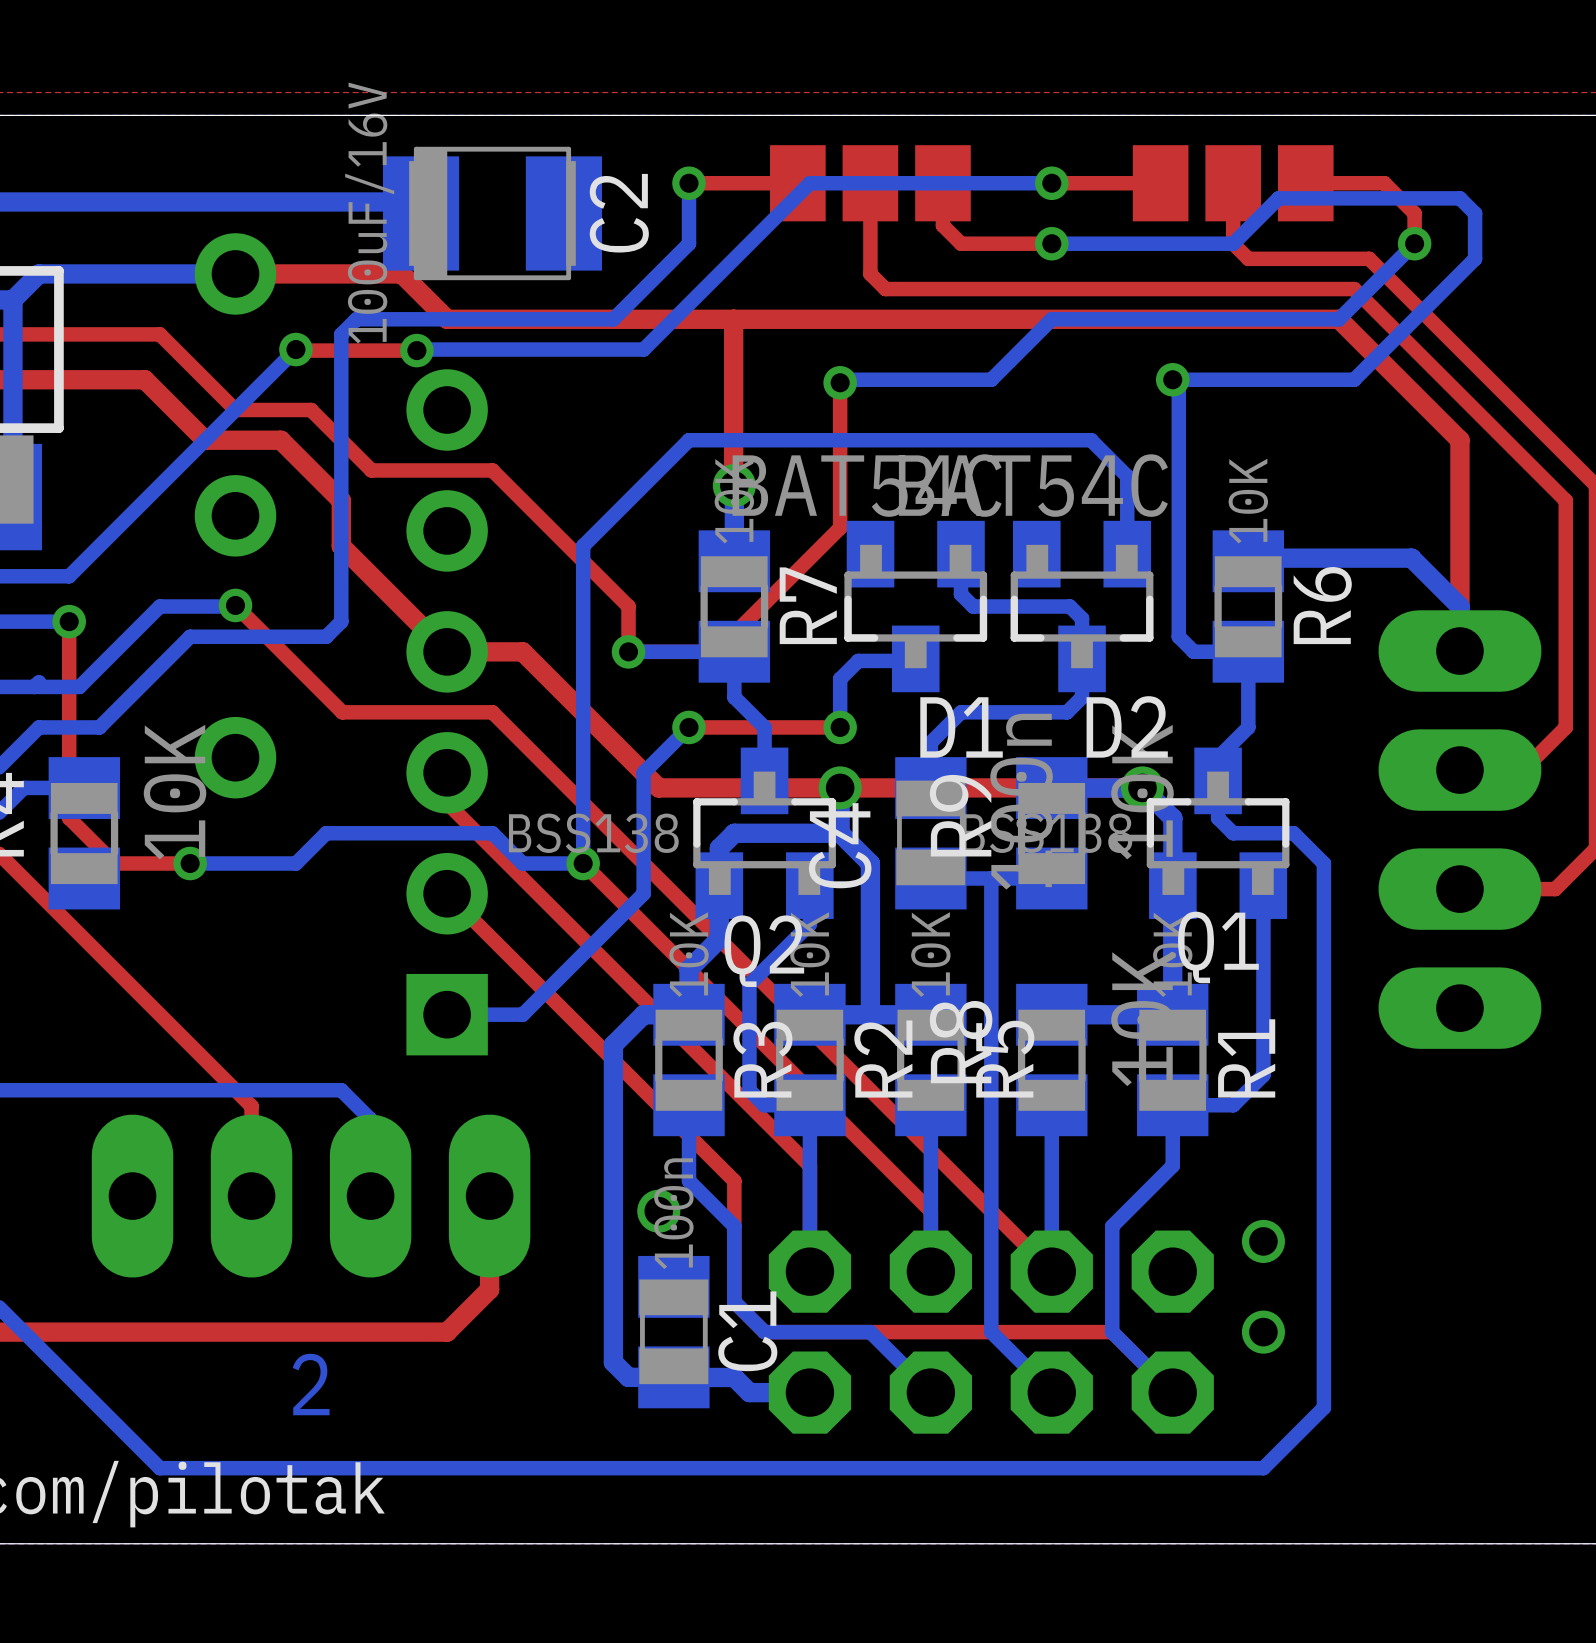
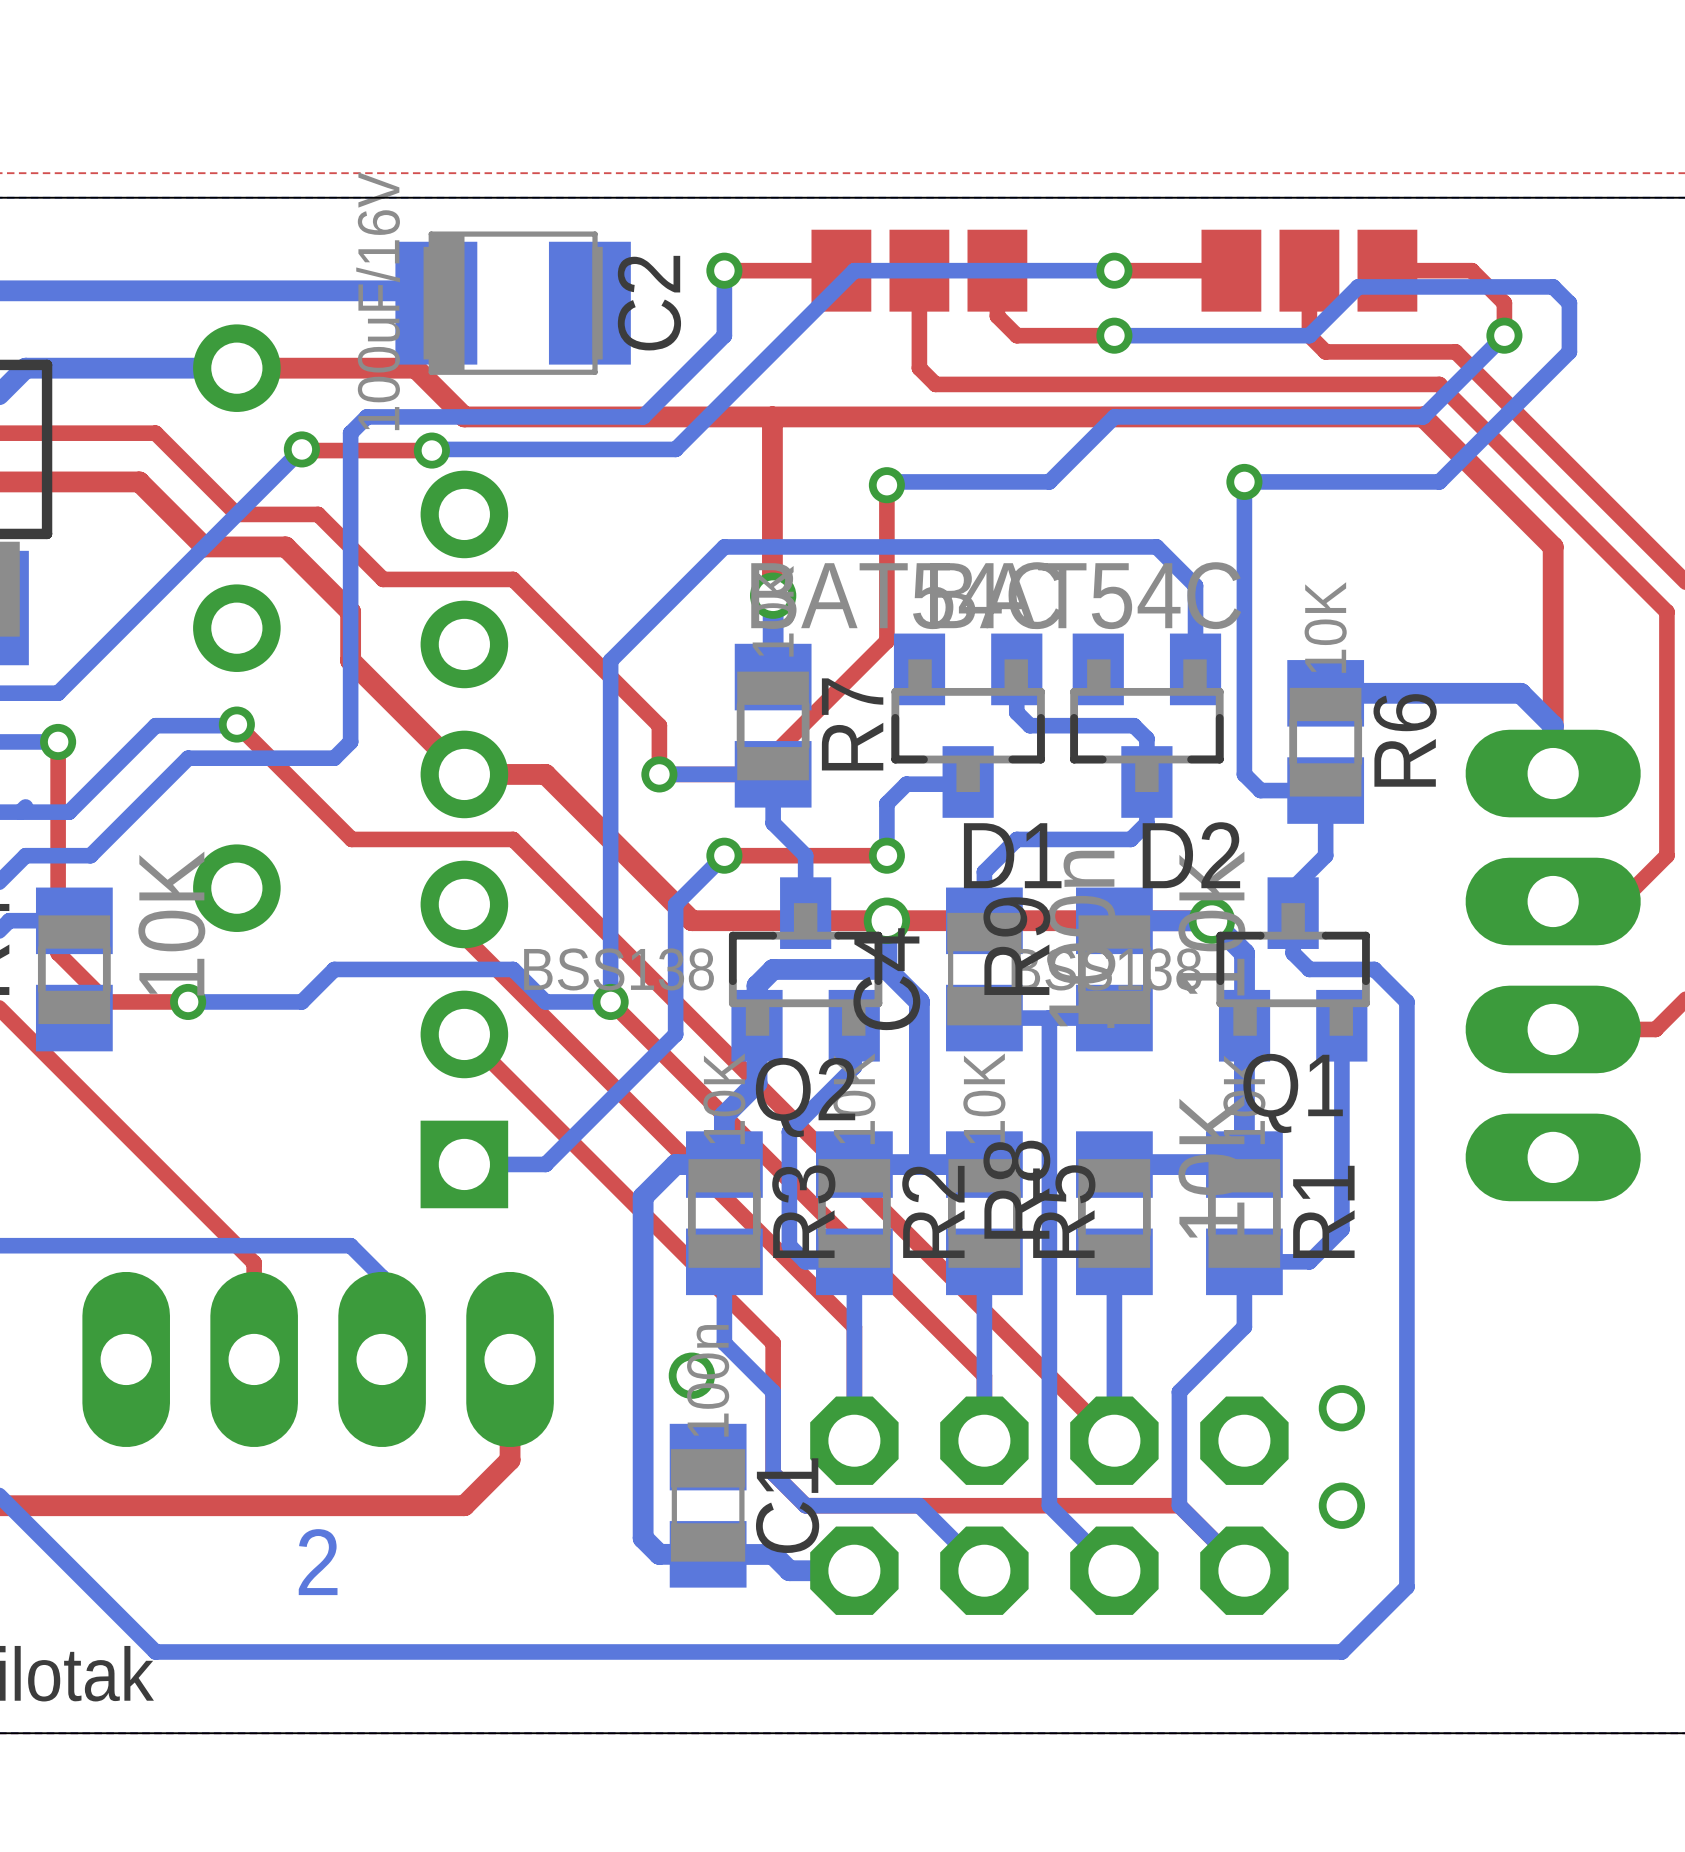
bottom track: (1172, 379) (1178, 385) (1178, 636) (1193, 651) (1248, 651) (1248, 666) -> (1244, 481) (1244, 774) (1260, 790) (1325, 790)
bottom track: (1248, 561) (1251, 558) (1411, 558) (1429, 576) -> (1325, 693) (1520, 693)
R6 position: (1248, 606) -> (1325, 741)

